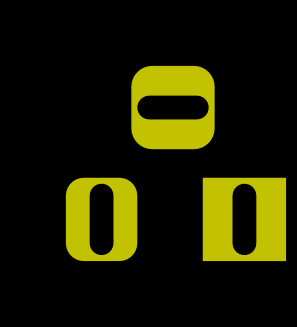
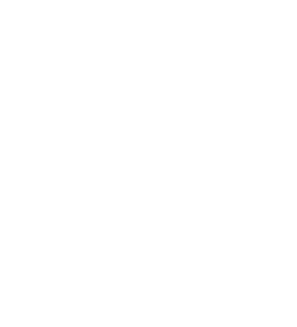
part: (175, 163) -> none

